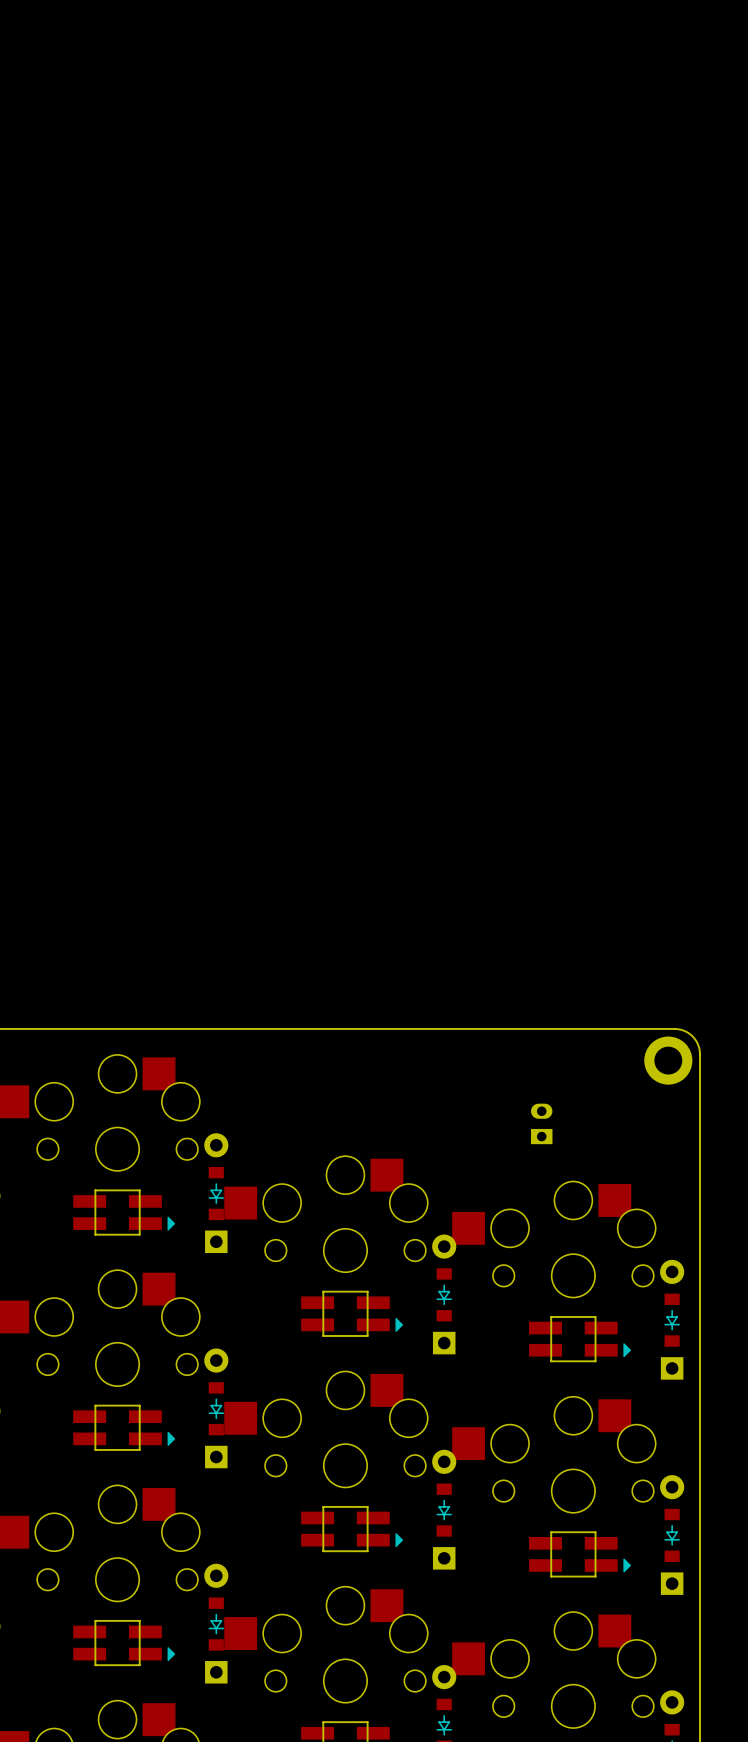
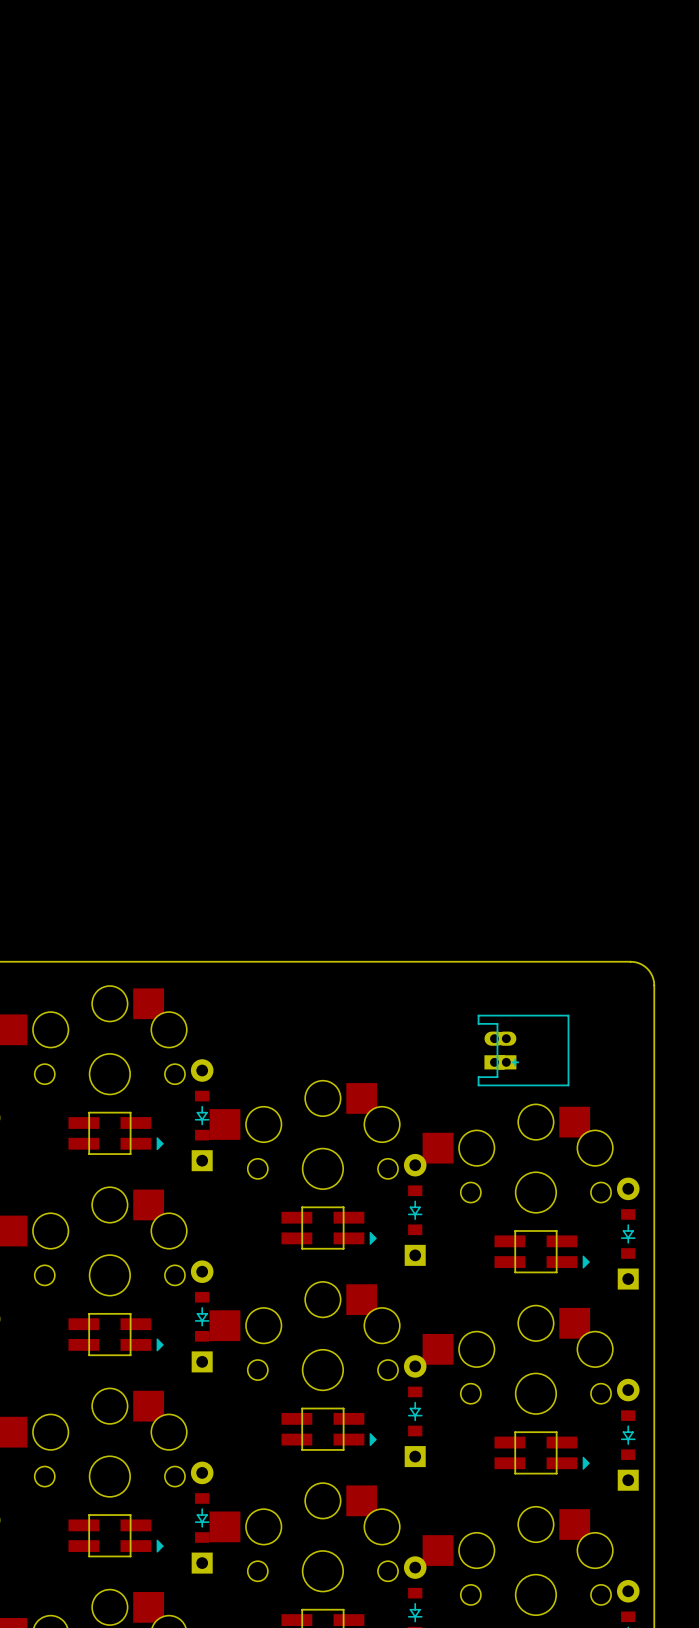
part: (668, 1060) -> none
part: none -> (523, 1050)

